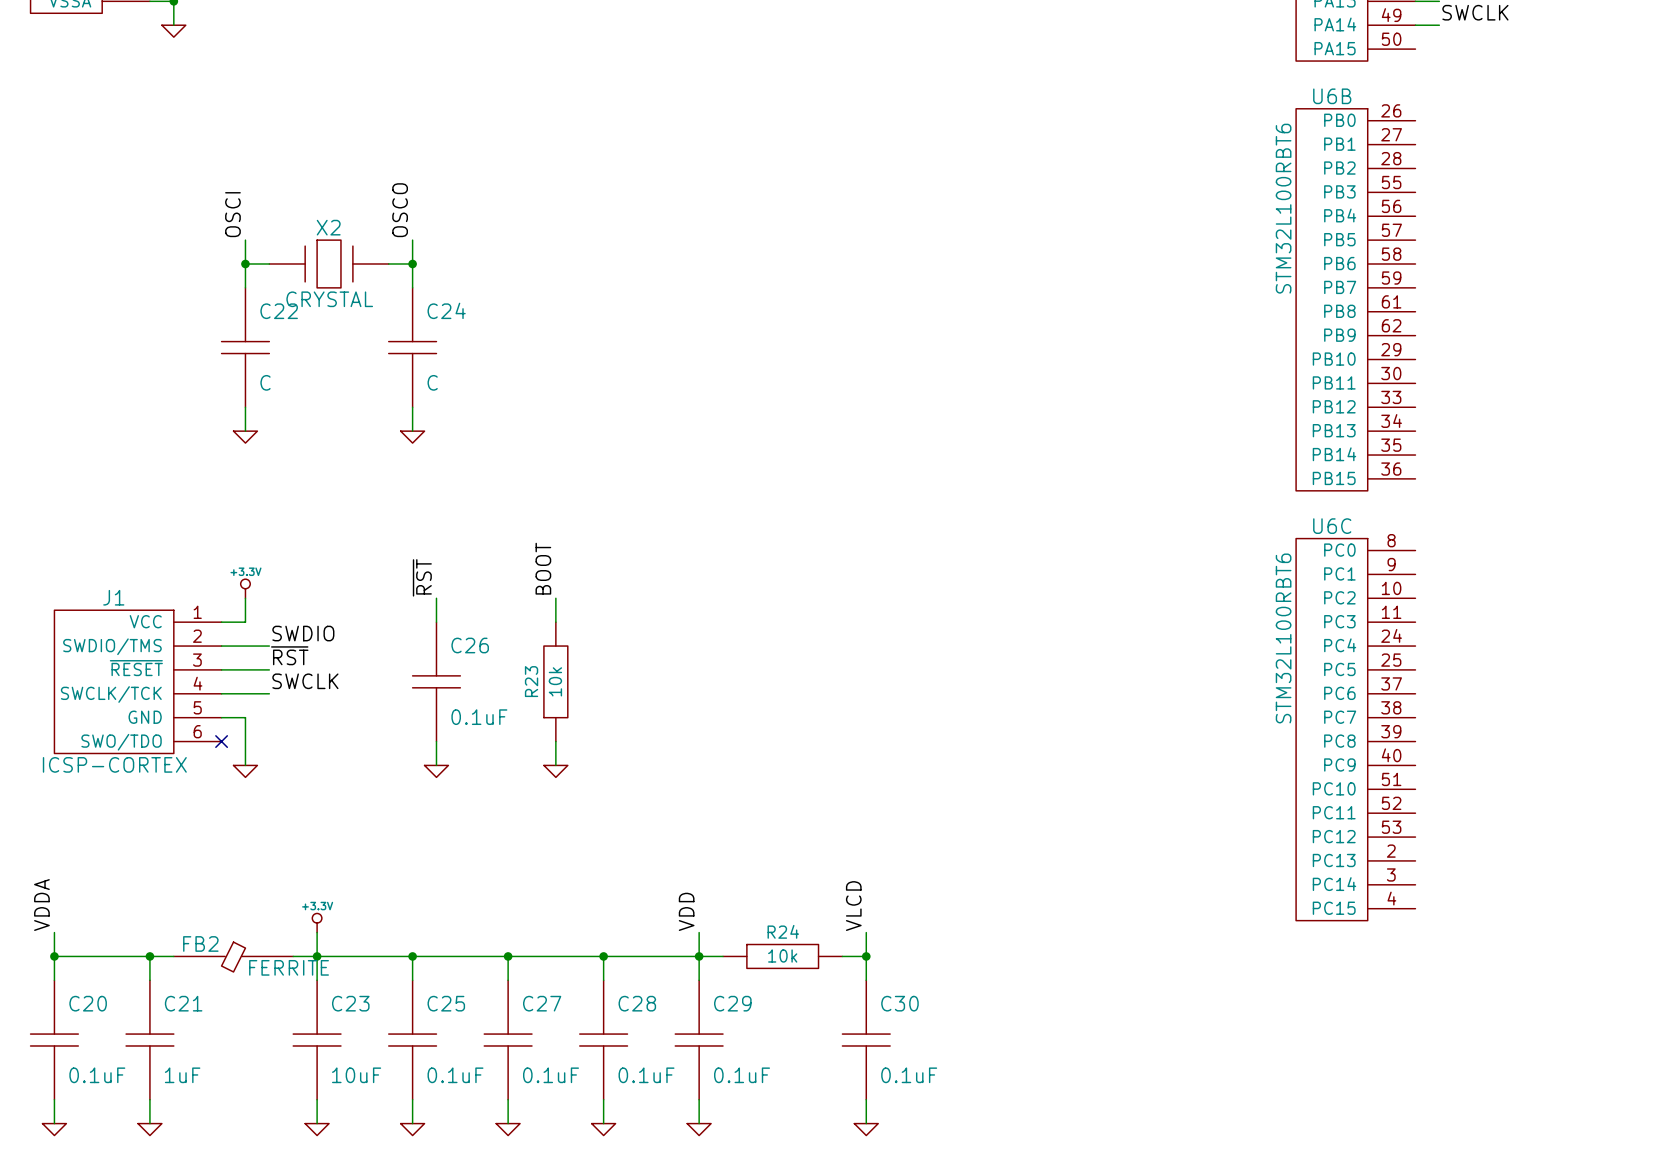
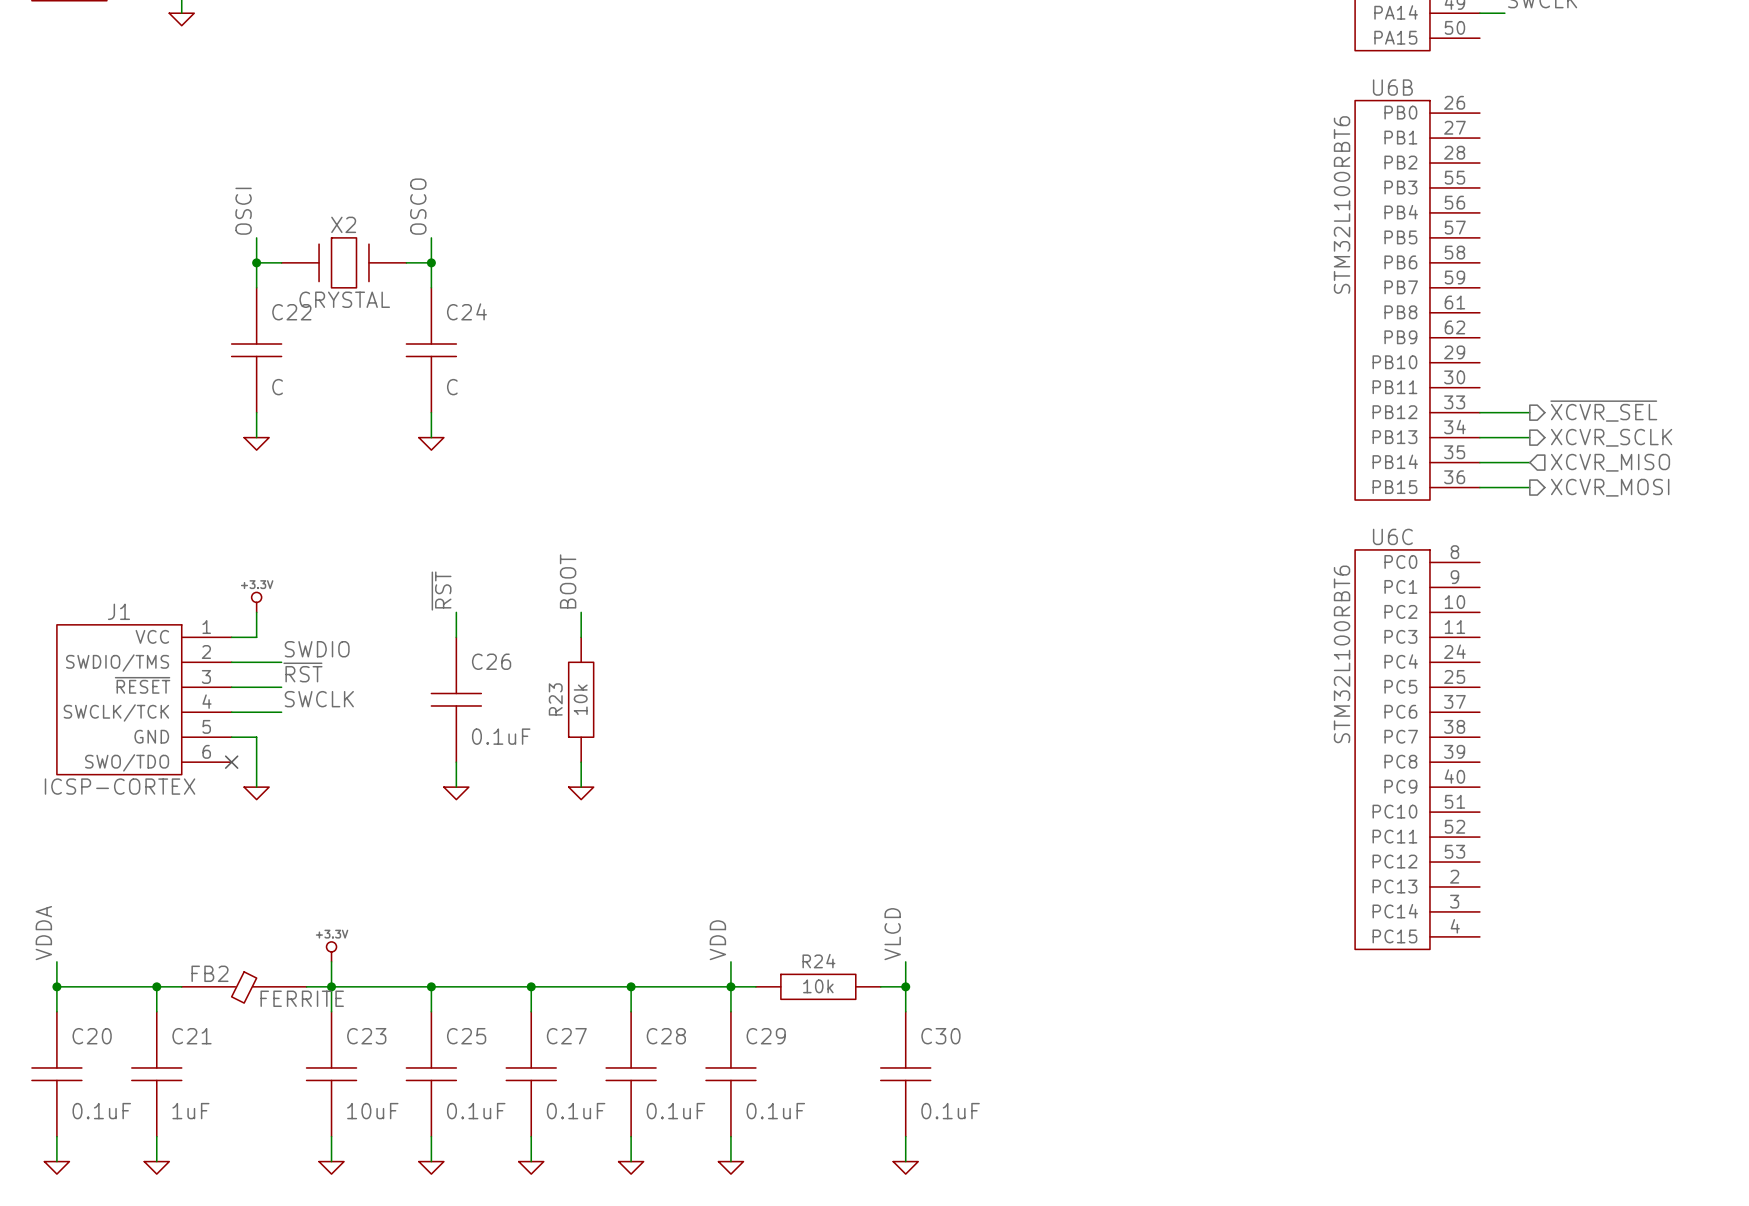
hierarchical label: none -> ~{XCVR_SEL} (1603, 411)
wire: none -> (1479, 412) (1529, 412)
wire: none -> (1479, 437) (1529, 437)
hierarchical label: none -> XCVR_SCLK (1611, 437)
wire: none -> (1479, 462) (1529, 462)
hierarchical label: none -> XCVR_MISO (1610, 462)
wire: none -> (1479, 487) (1529, 487)
hierarchical label: none -> XCVR_MOSI (1610, 487)

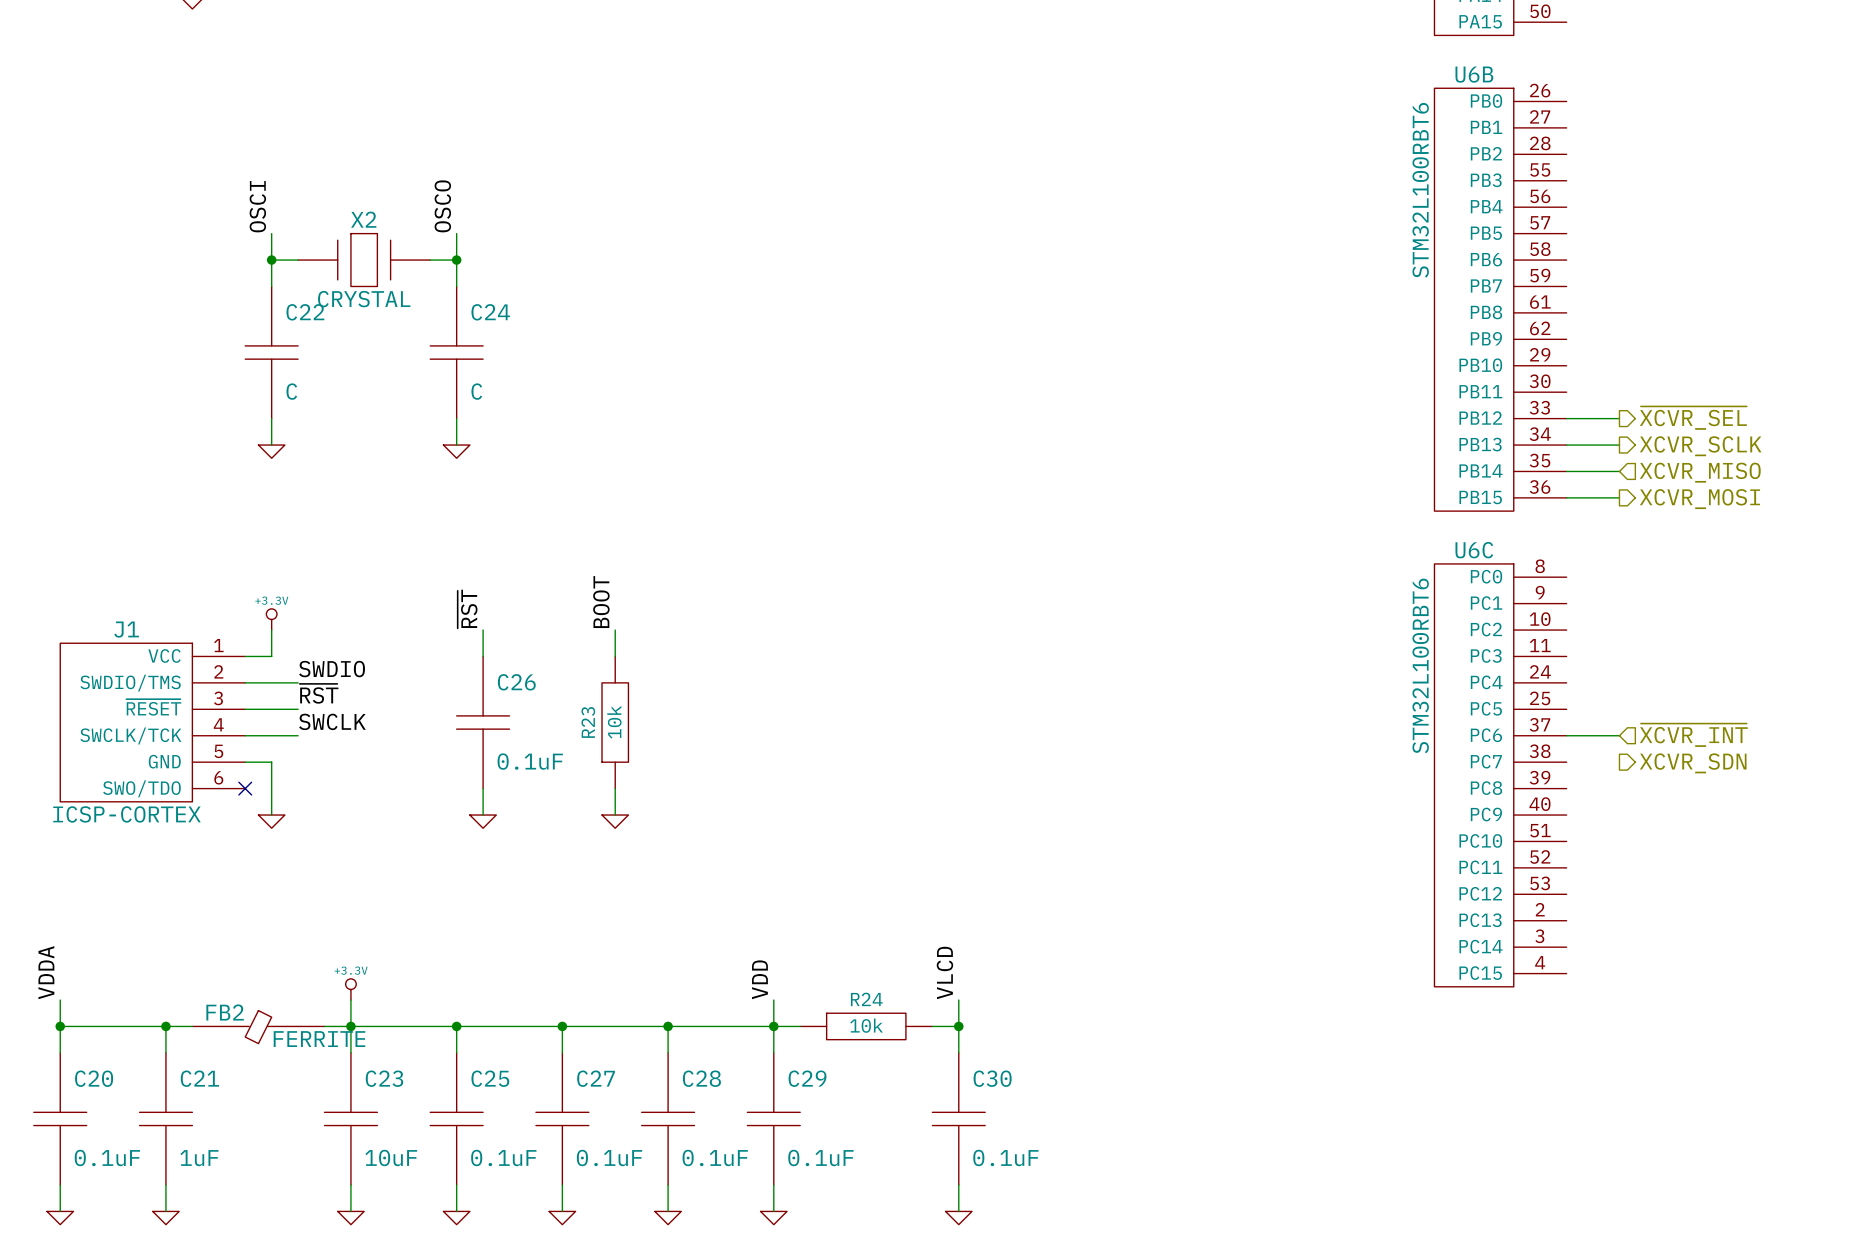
hierarchical label: none -> ~{XCVR_INT} (1693, 735)
wire: none -> (1566, 735) (1619, 735)
hierarchical label: none -> XCVR_SDN (1693, 763)

